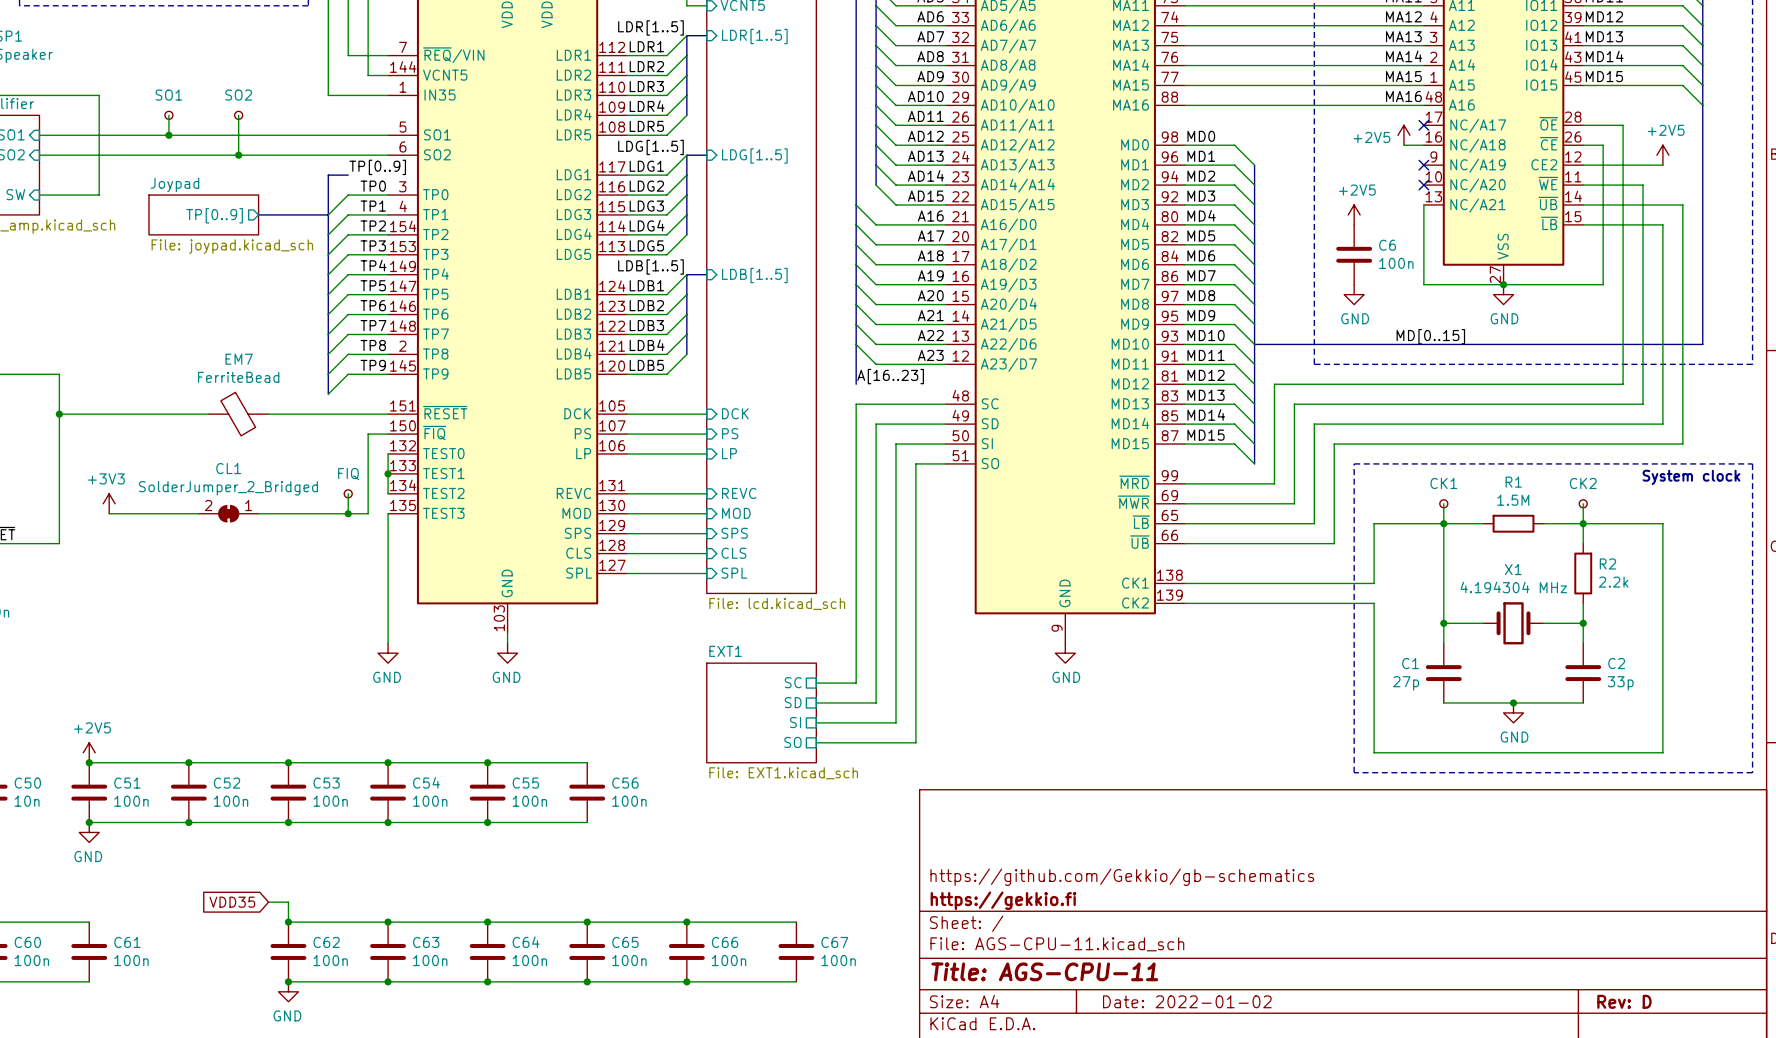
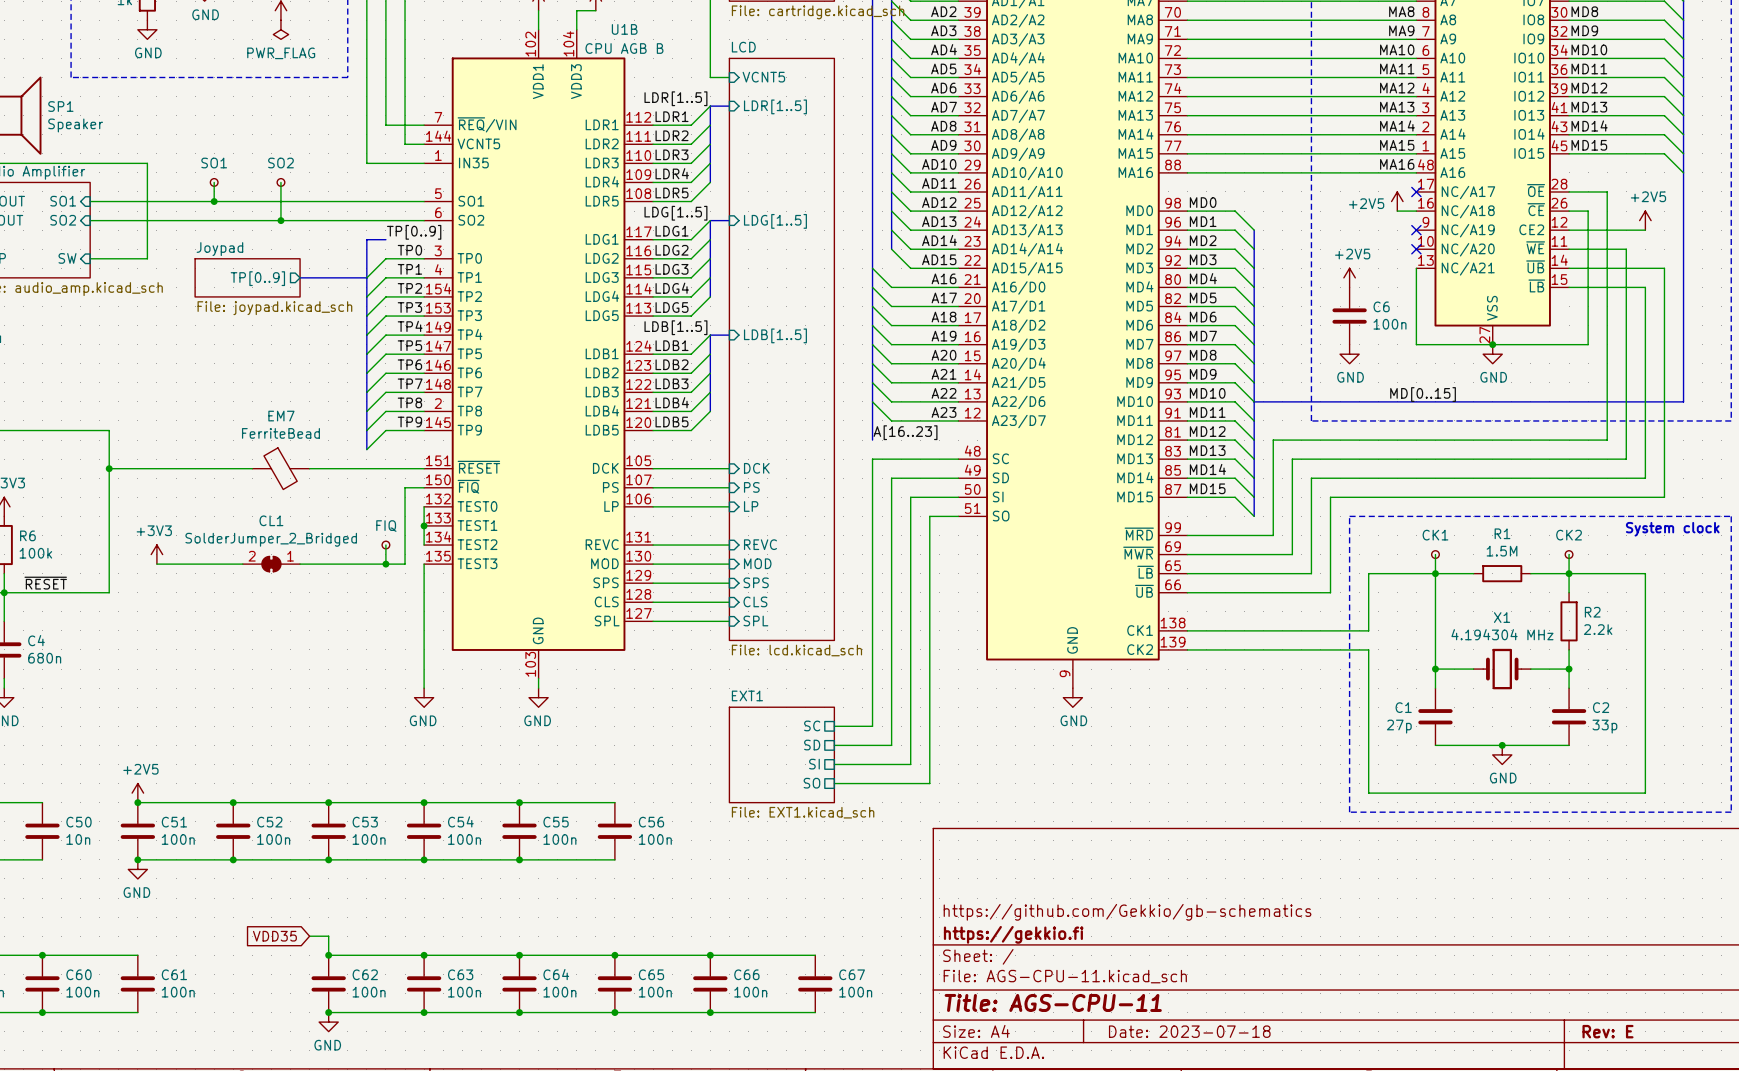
title block: Date: 2022-01-02 (1187, 1001) -> Date: 2023-07-18 (1189, 1031)
title block: Rev: D (1624, 1001) -> Rev: E (1608, 1031)

